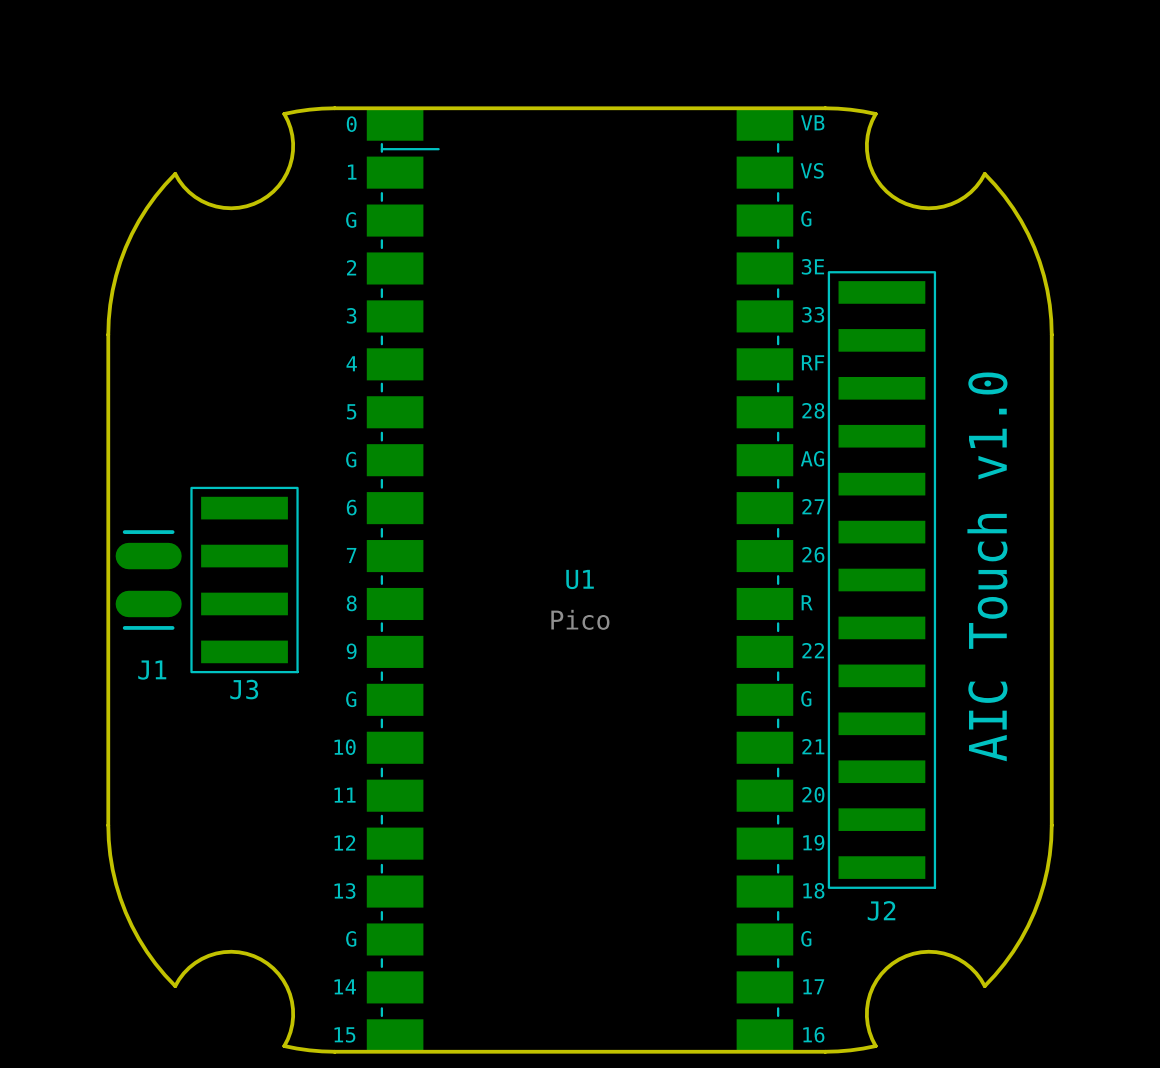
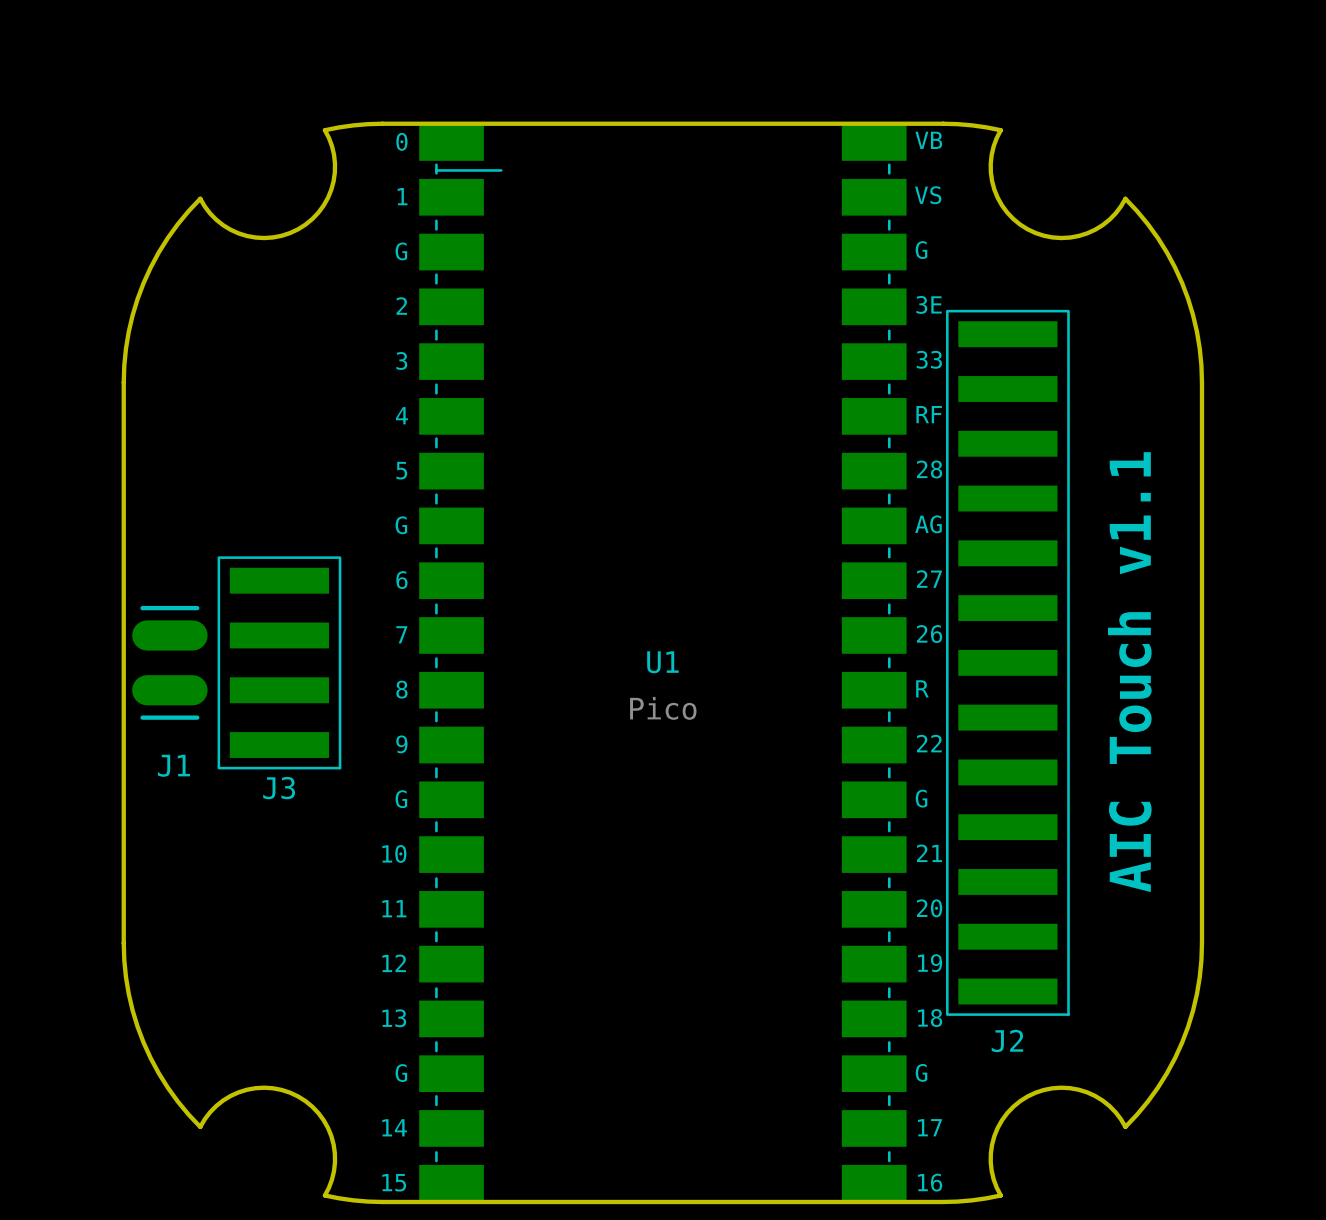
text: AIC Touch v1.0 (987, 566) -> AIC Touch v1.1 (1129, 672)

